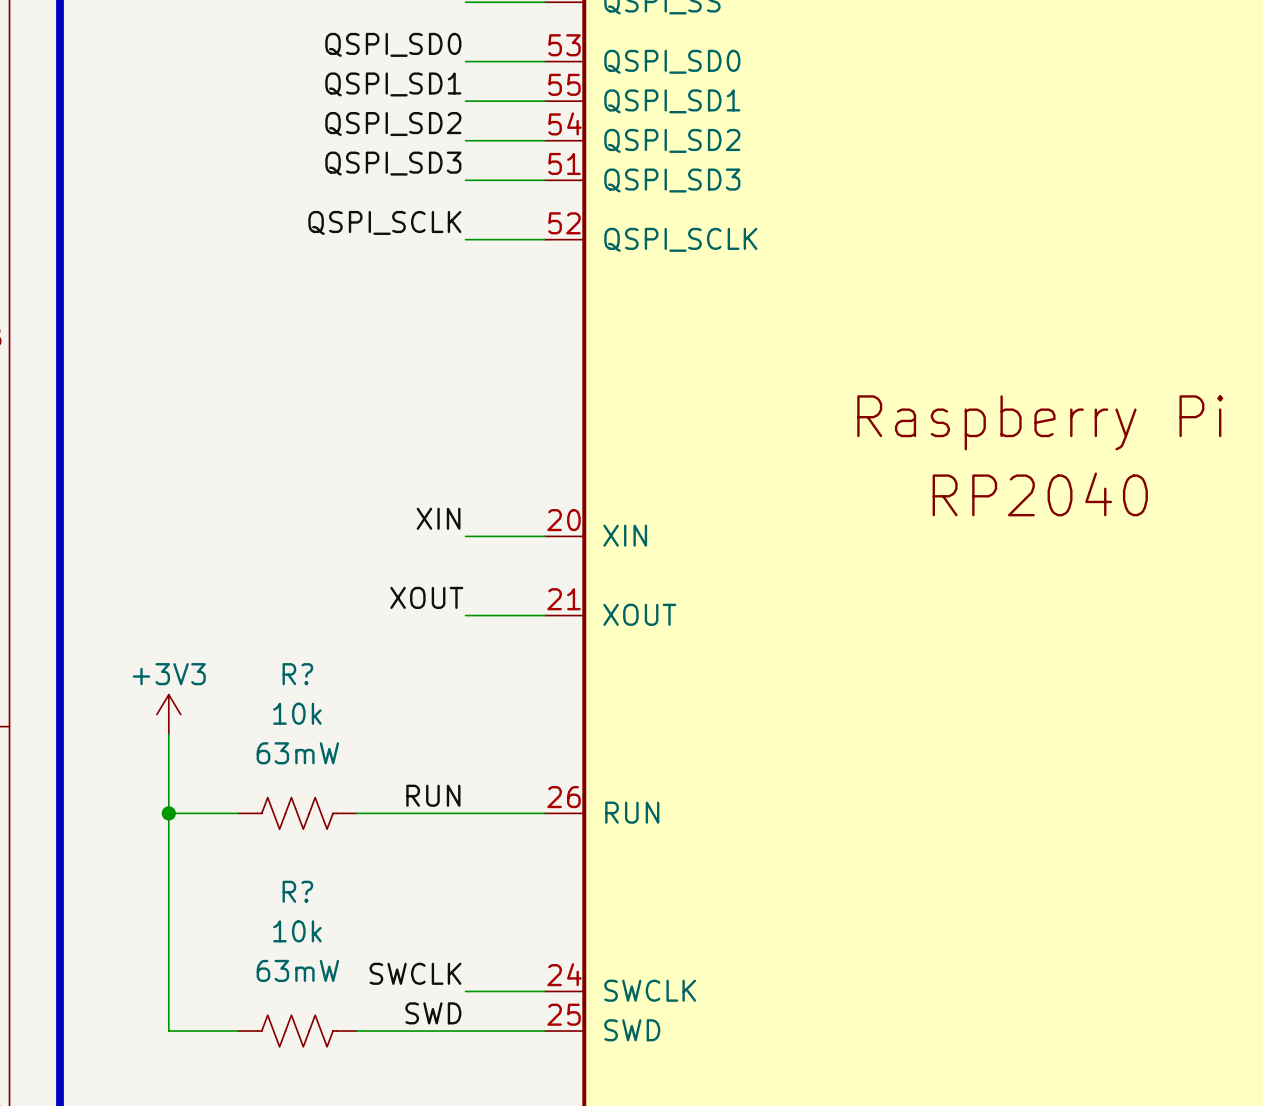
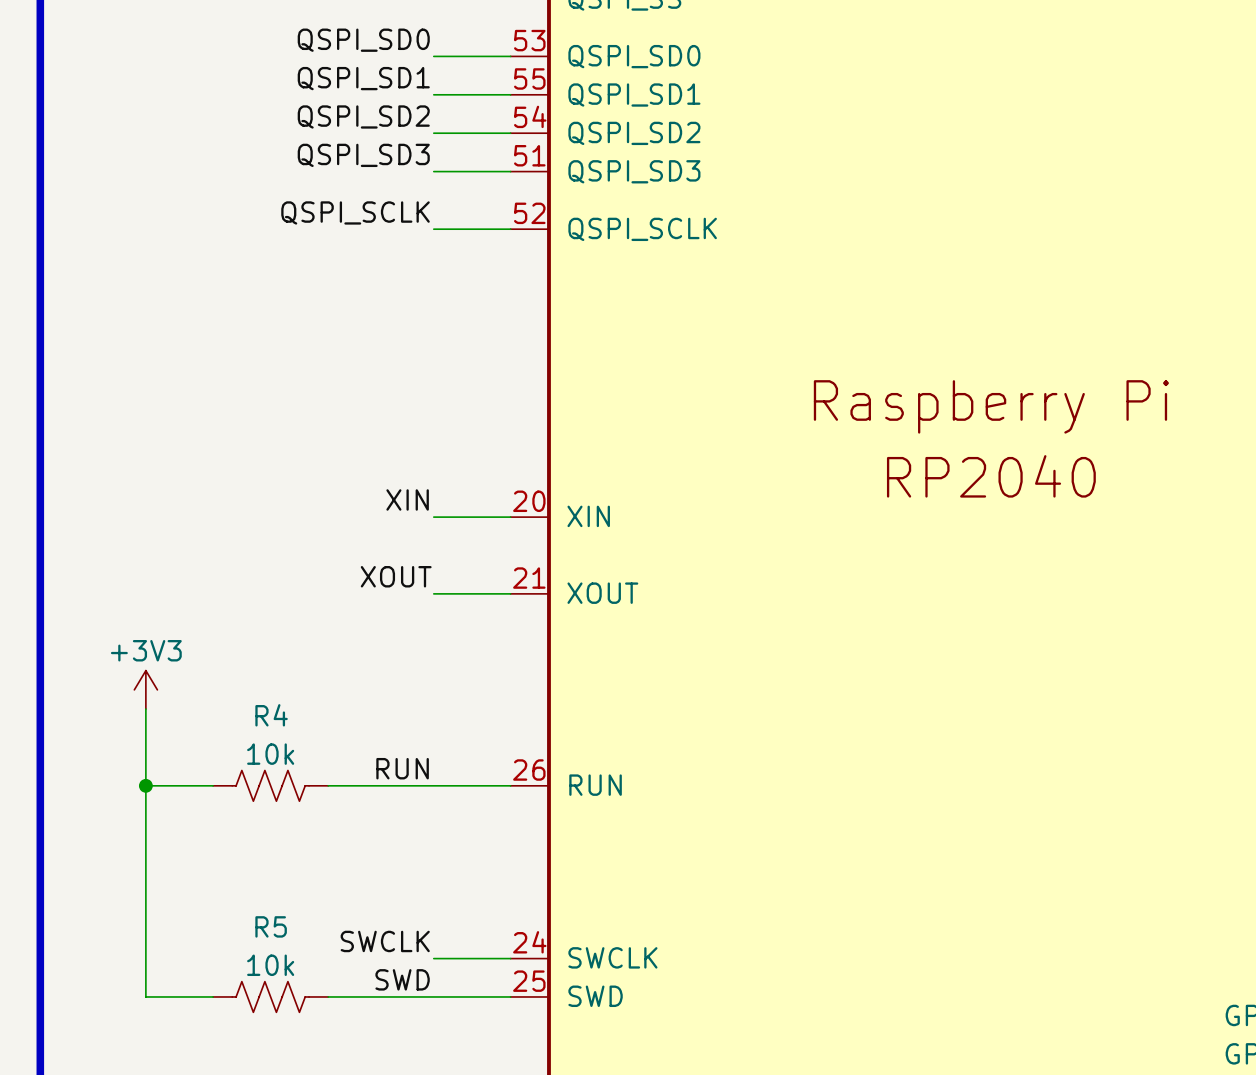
R? name: R? (297, 674) -> R4 (271, 715)
R? value position: 10k (297, 713) -> 10k (270, 754)
R? text: 63mW (297, 753) -> none
R? name: R? (297, 891) -> R5 (271, 926)
R? value position: 10k (297, 931) -> 10k (270, 965)
R? text: 63mW (297, 970) -> none

